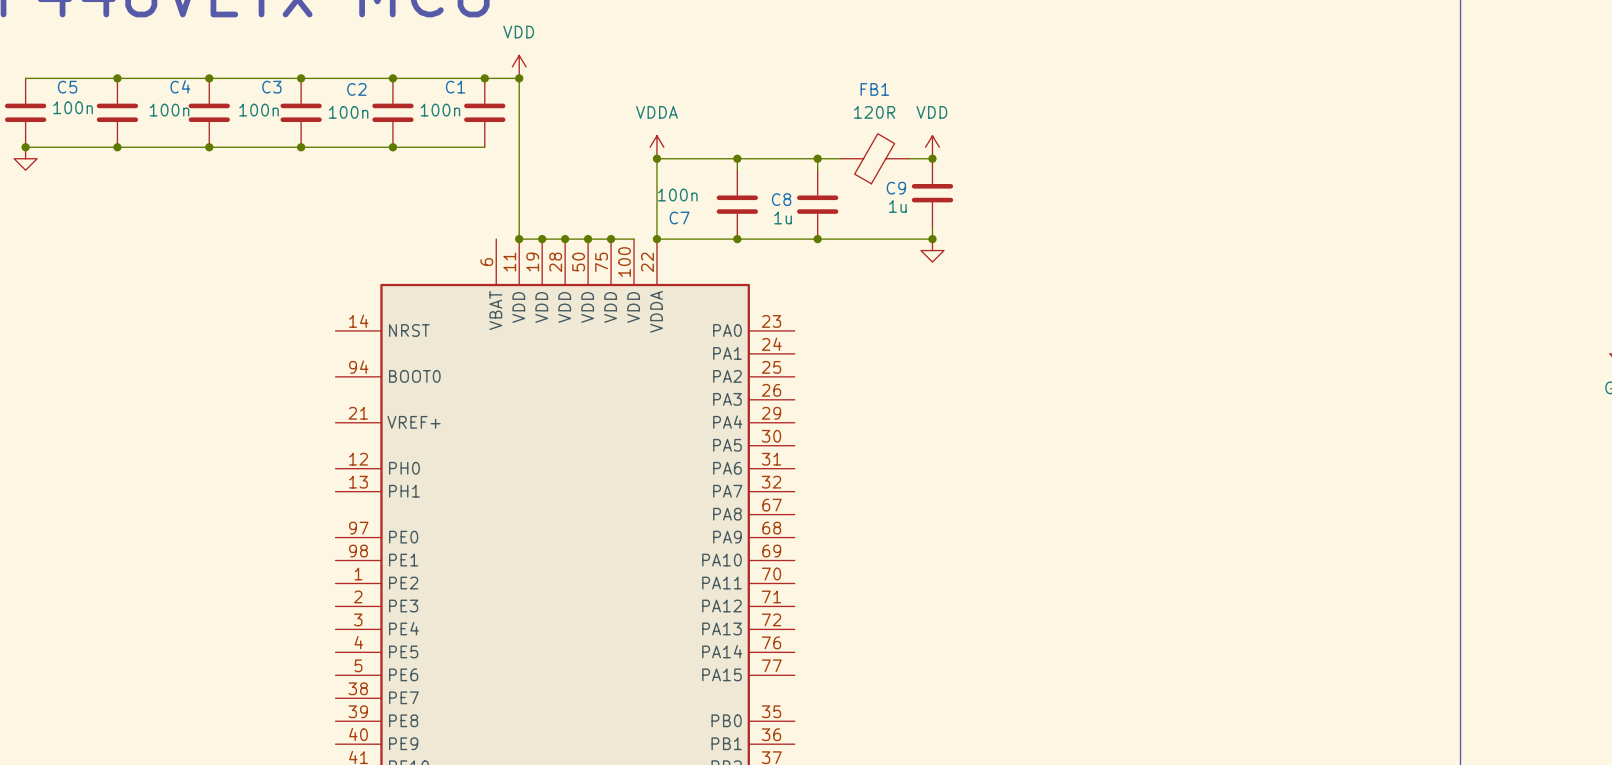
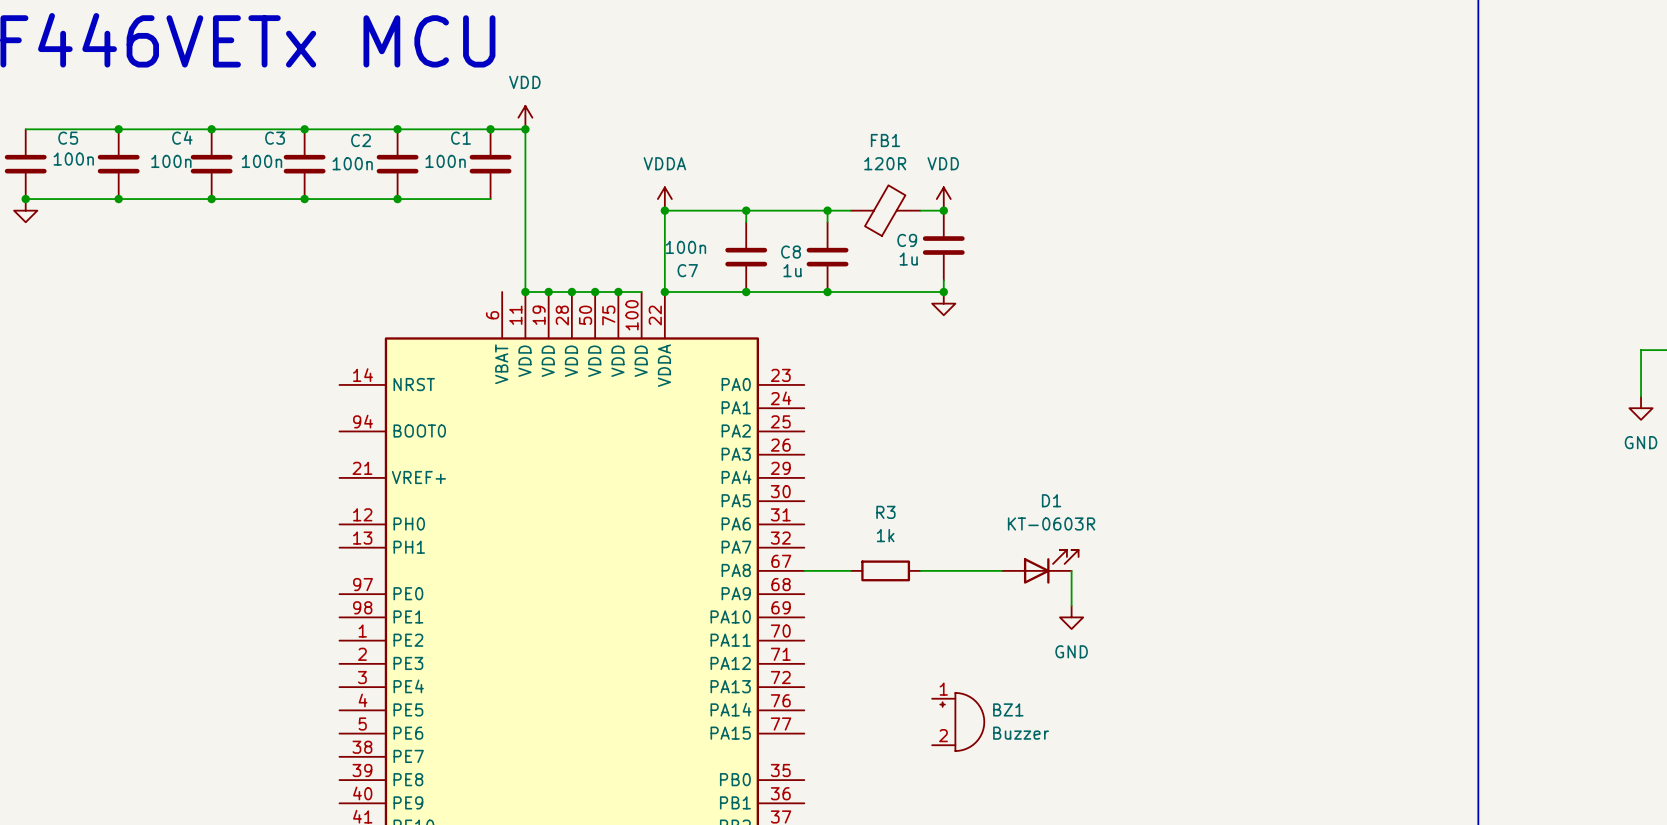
D1: none -> KT-0603R (1040, 566)
wire: none -> (804, 570) (850, 570)
R3: none -> 1k (885, 570)
wire: none -> (920, 570) (1001, 570)
wire: none -> (1071, 570) (1071, 605)
power symbol: none -> GND (1071, 617)
BZ1: none -> Buzzer (958, 721)

